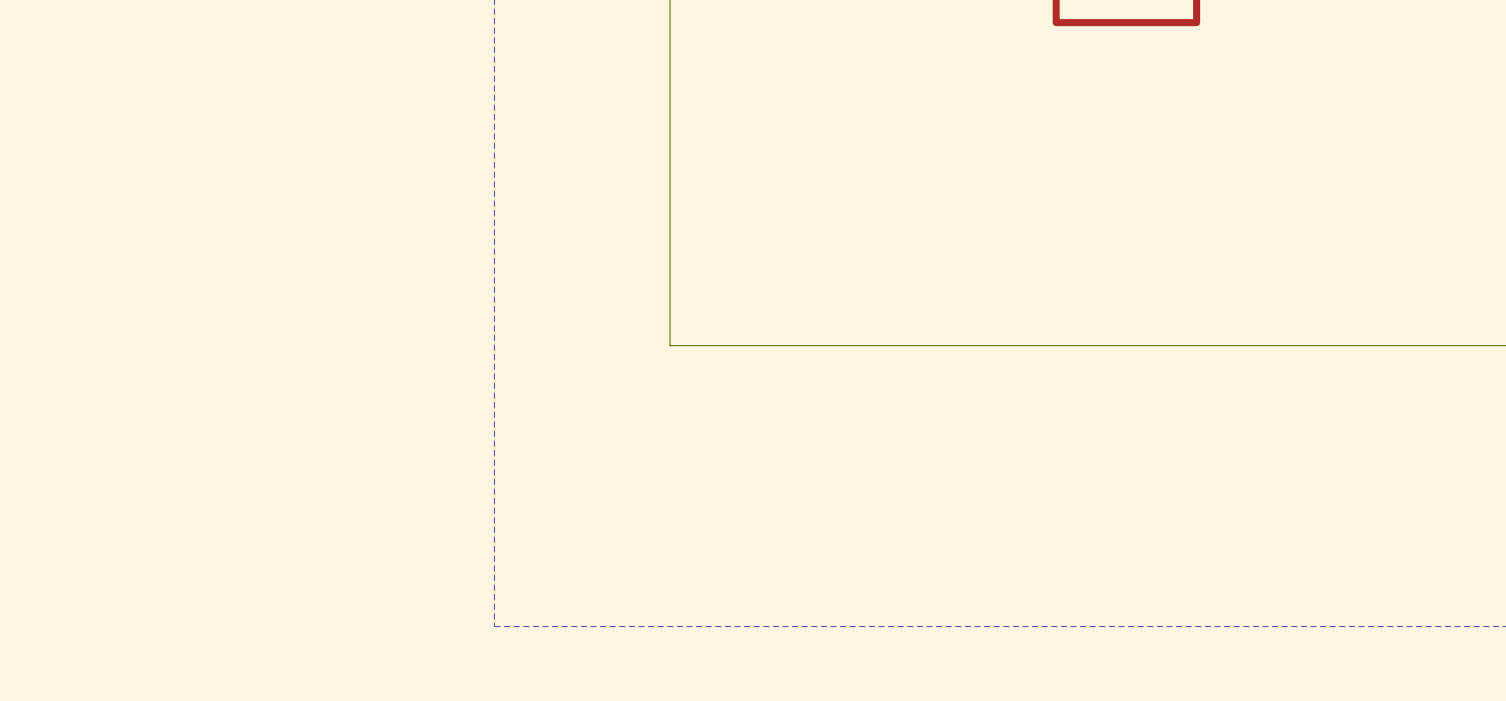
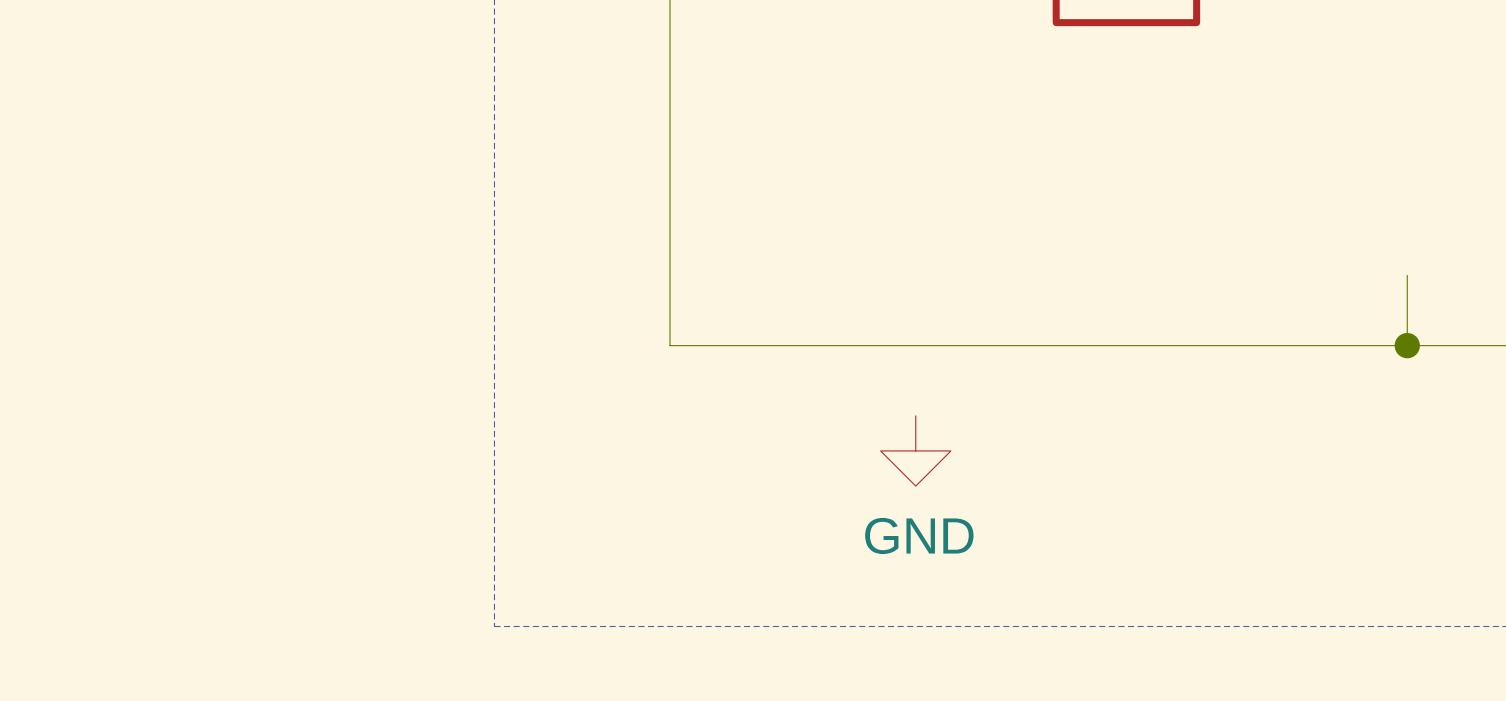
wire: none -> (1407, 275) (1407, 345)
junction: none -> (1407, 345)
power symbol: none -> GND (915, 450)

